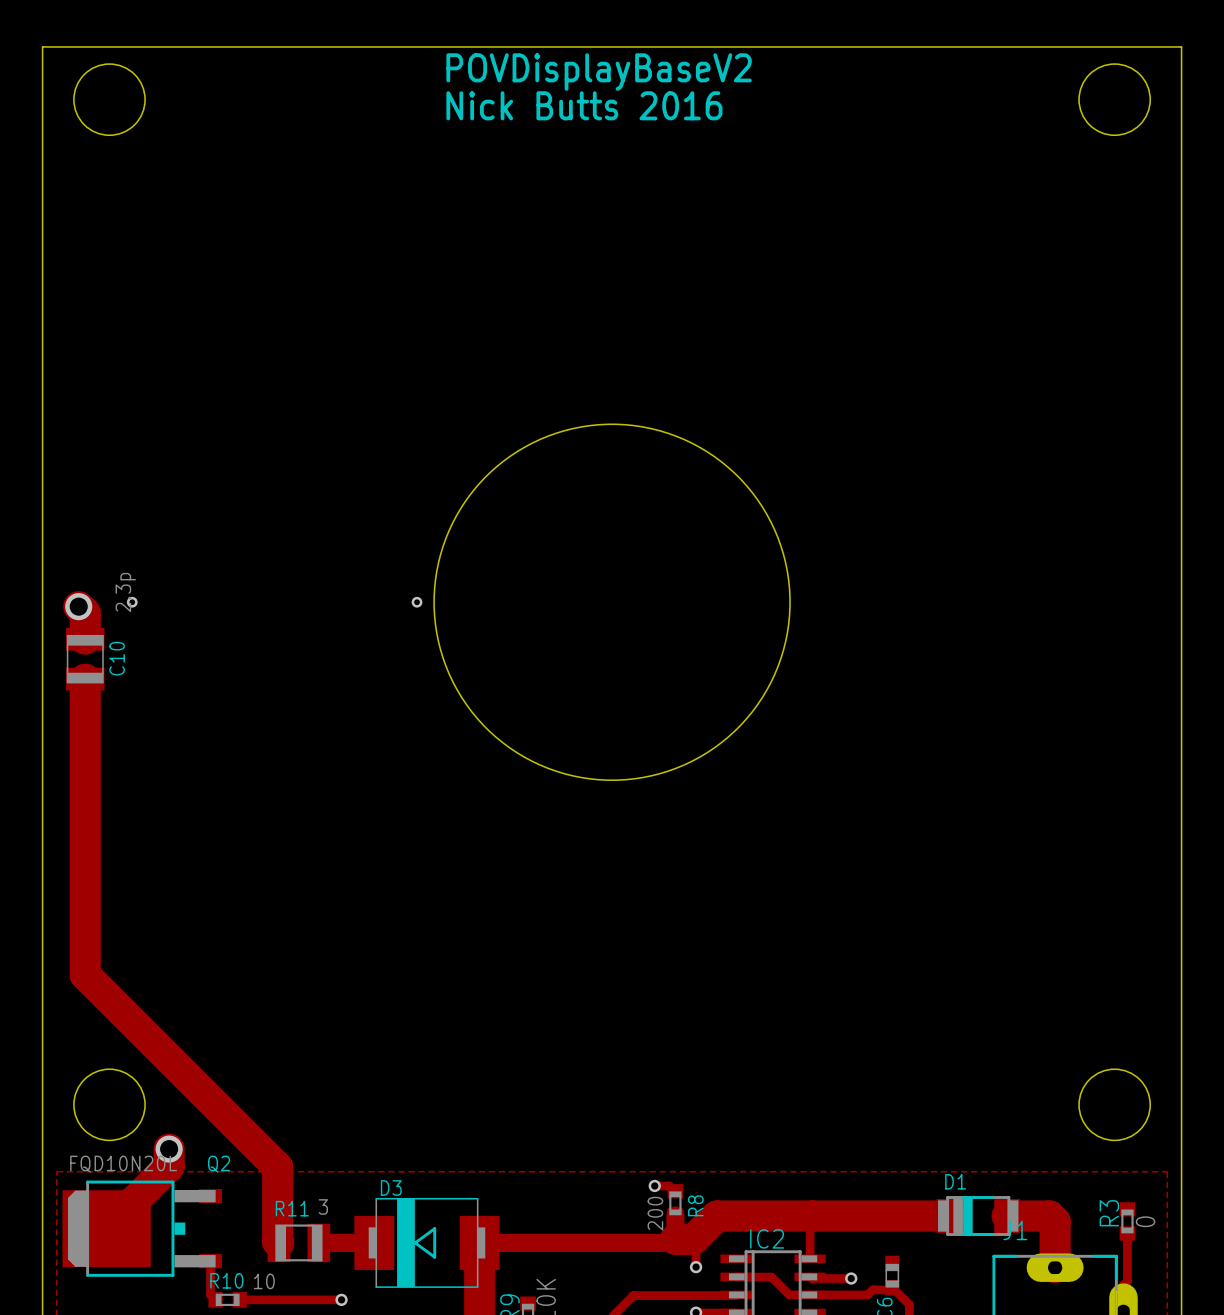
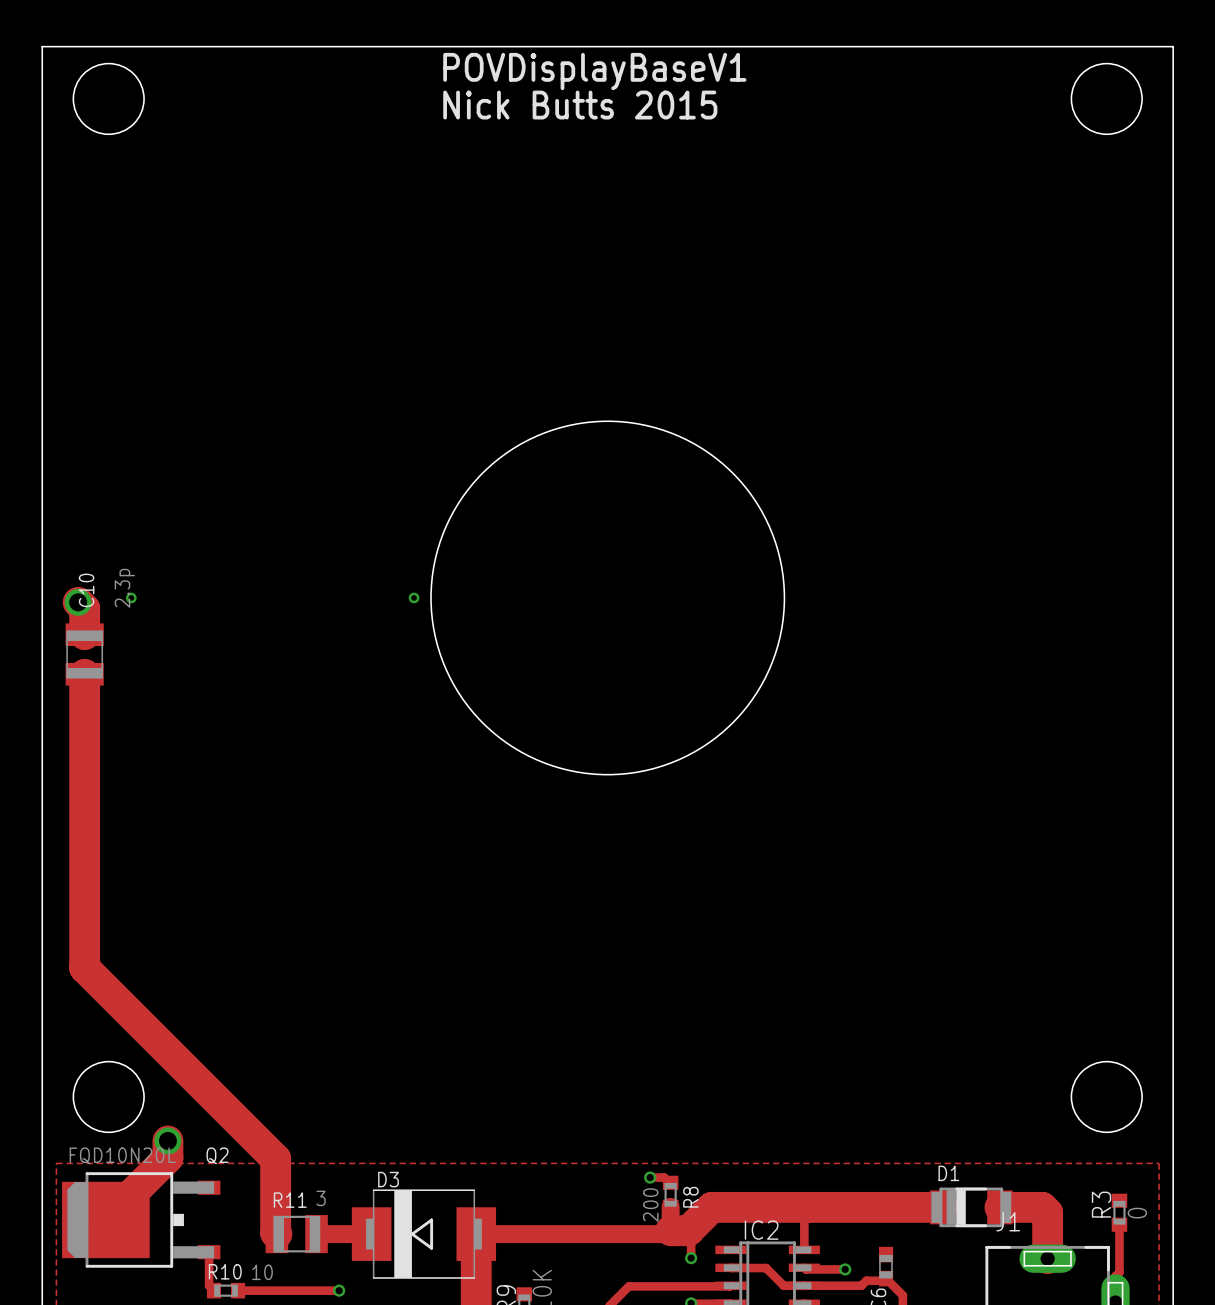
text: POVDisplayBaseV2 (599, 72) -> POVDisplayBaseV1 (594, 71)
text: Nick Butts 2016 (584, 105) -> Nick Butts 2015 (580, 105)
C10 name position: C10 (117, 658) -> C10 (86, 590)

